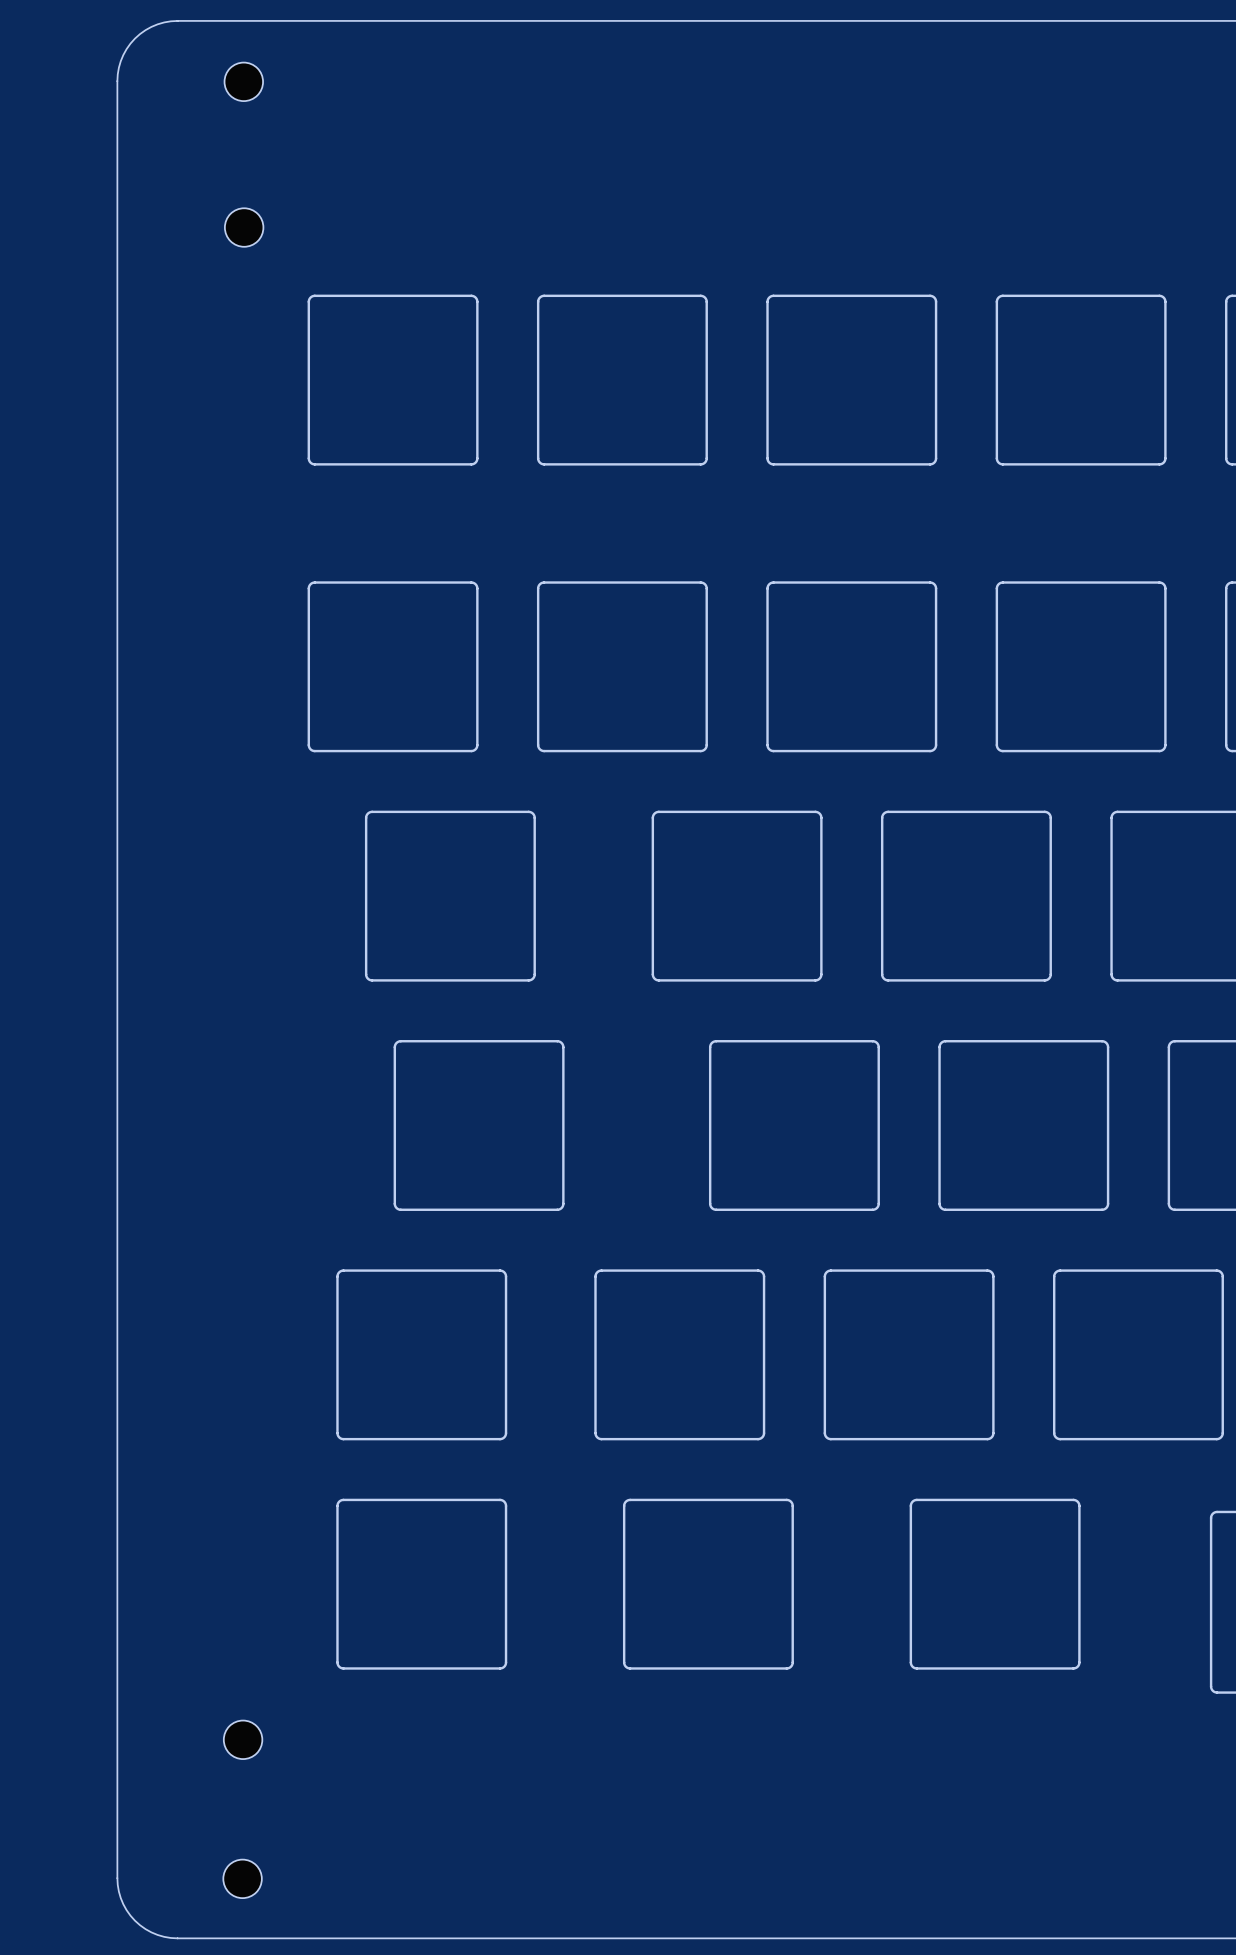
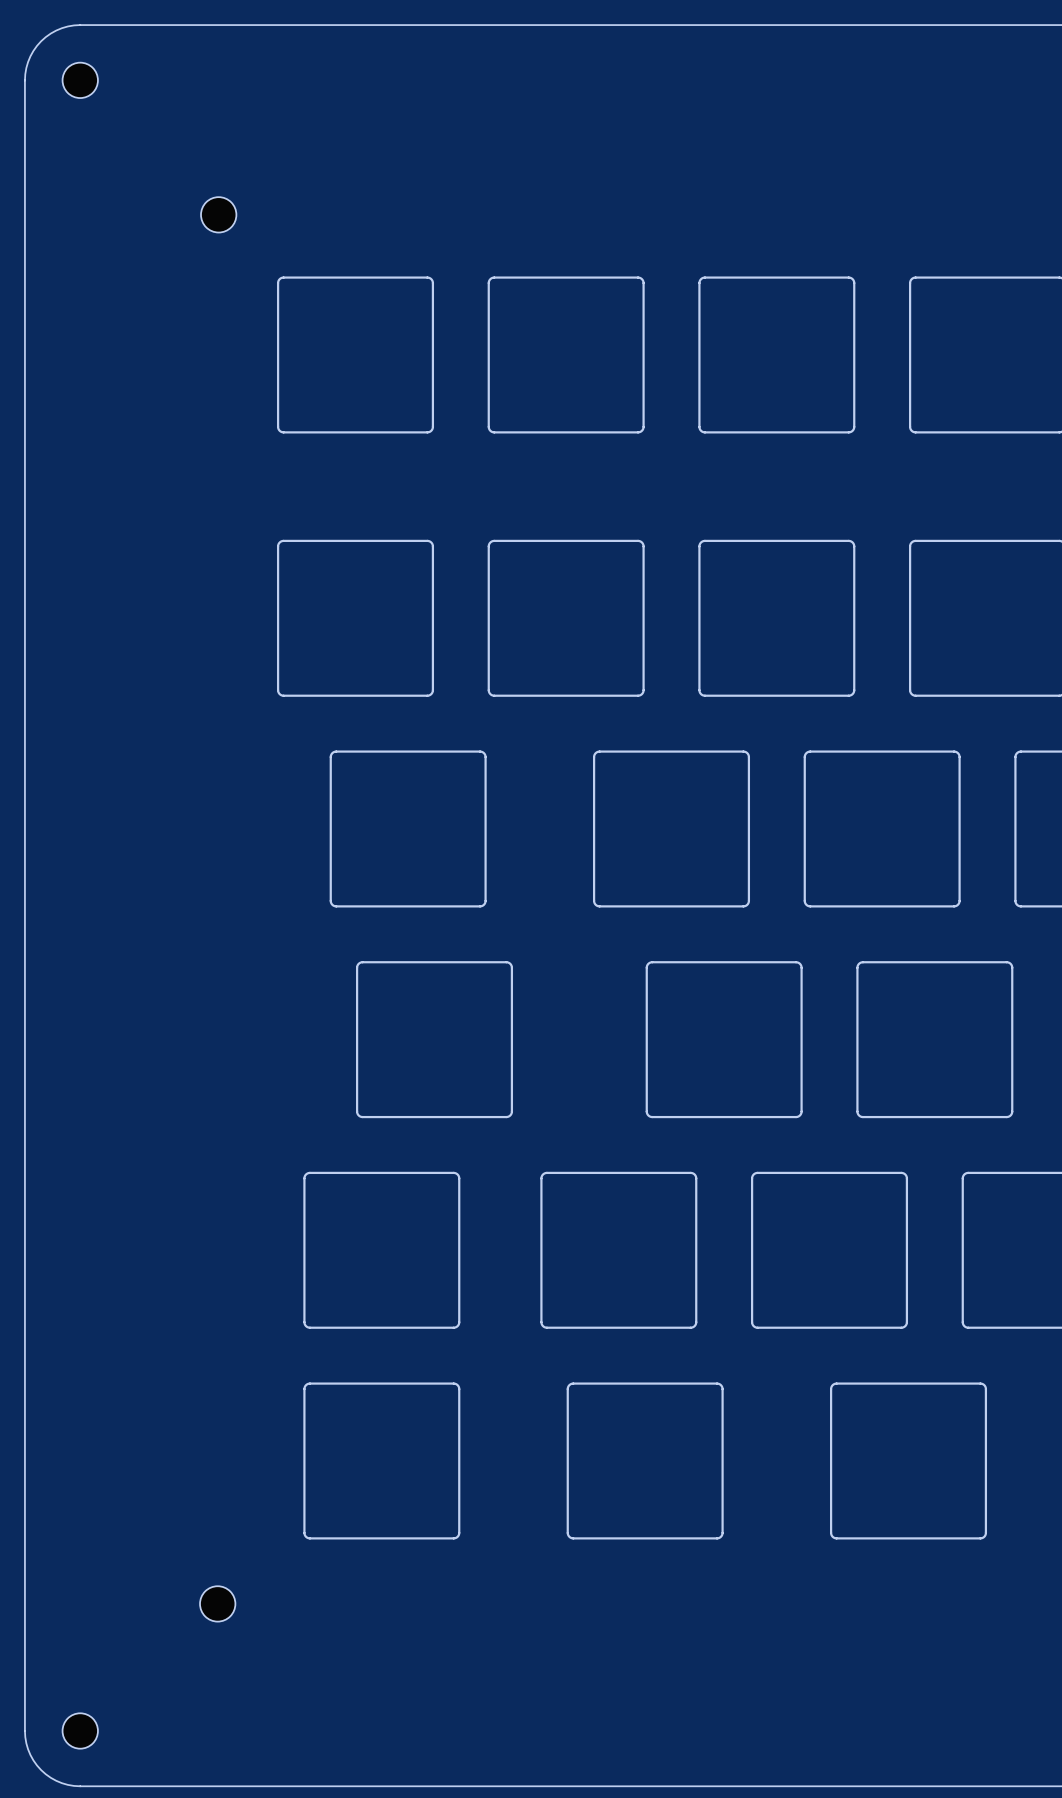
board edge: (177, 20) (164, 22) (151, 26) (135, 38) (123, 55) (118, 67) (117, 81) (117, 1878) (118, 1891) (123, 1904) (135, 1920) (145, 1929) (157, 1934) (177, 1938) -> (157, 25) (80, 25) (56, 30) (45, 37) (33, 50) (28, 62) (24, 80) (25, 1737) (30, 1754) (37, 1765) (50, 1777) (61, 1783) (80, 1786) (157, 1786)
part position: (243, 81) -> (80, 80)
part position: (242, 1878) -> (80, 1730)

